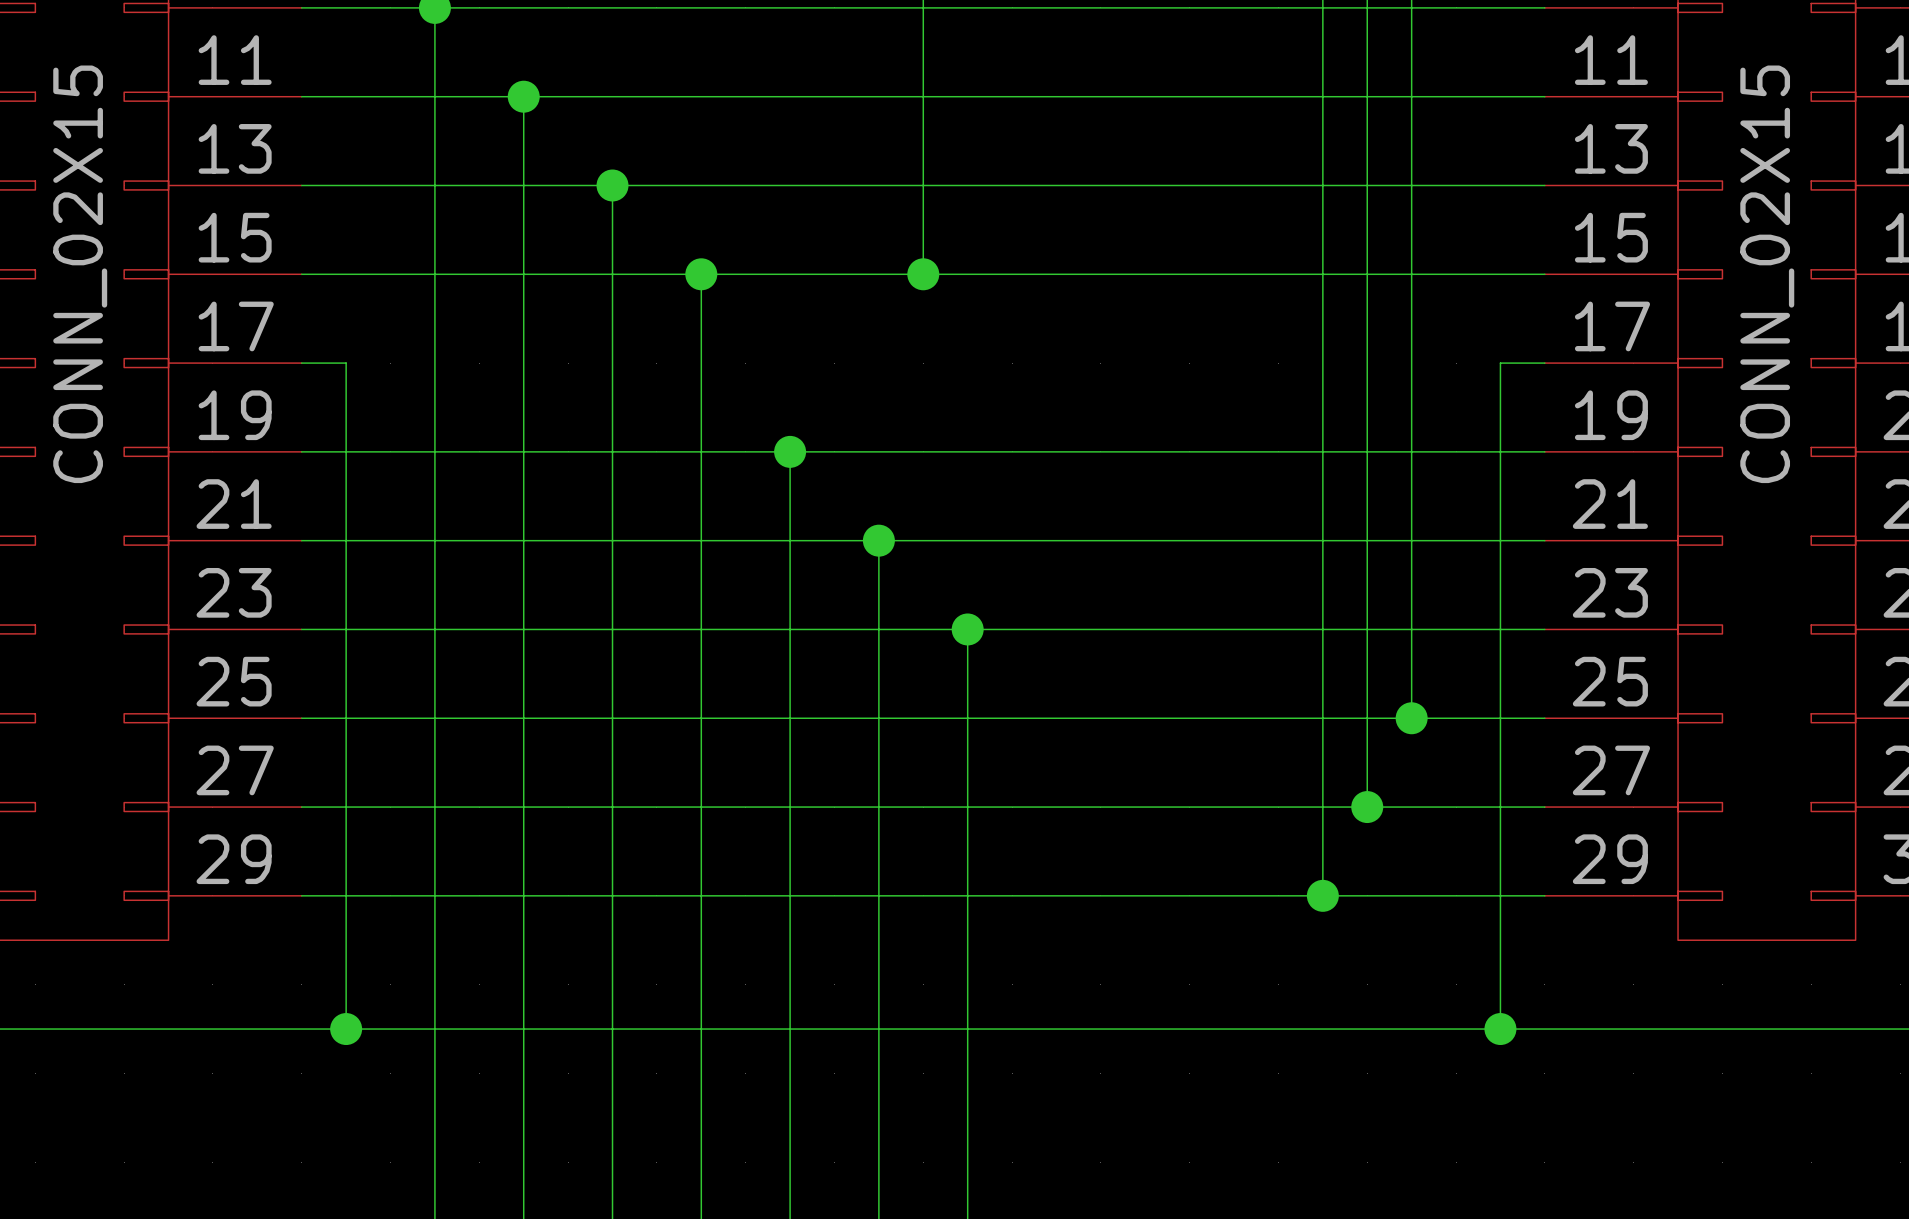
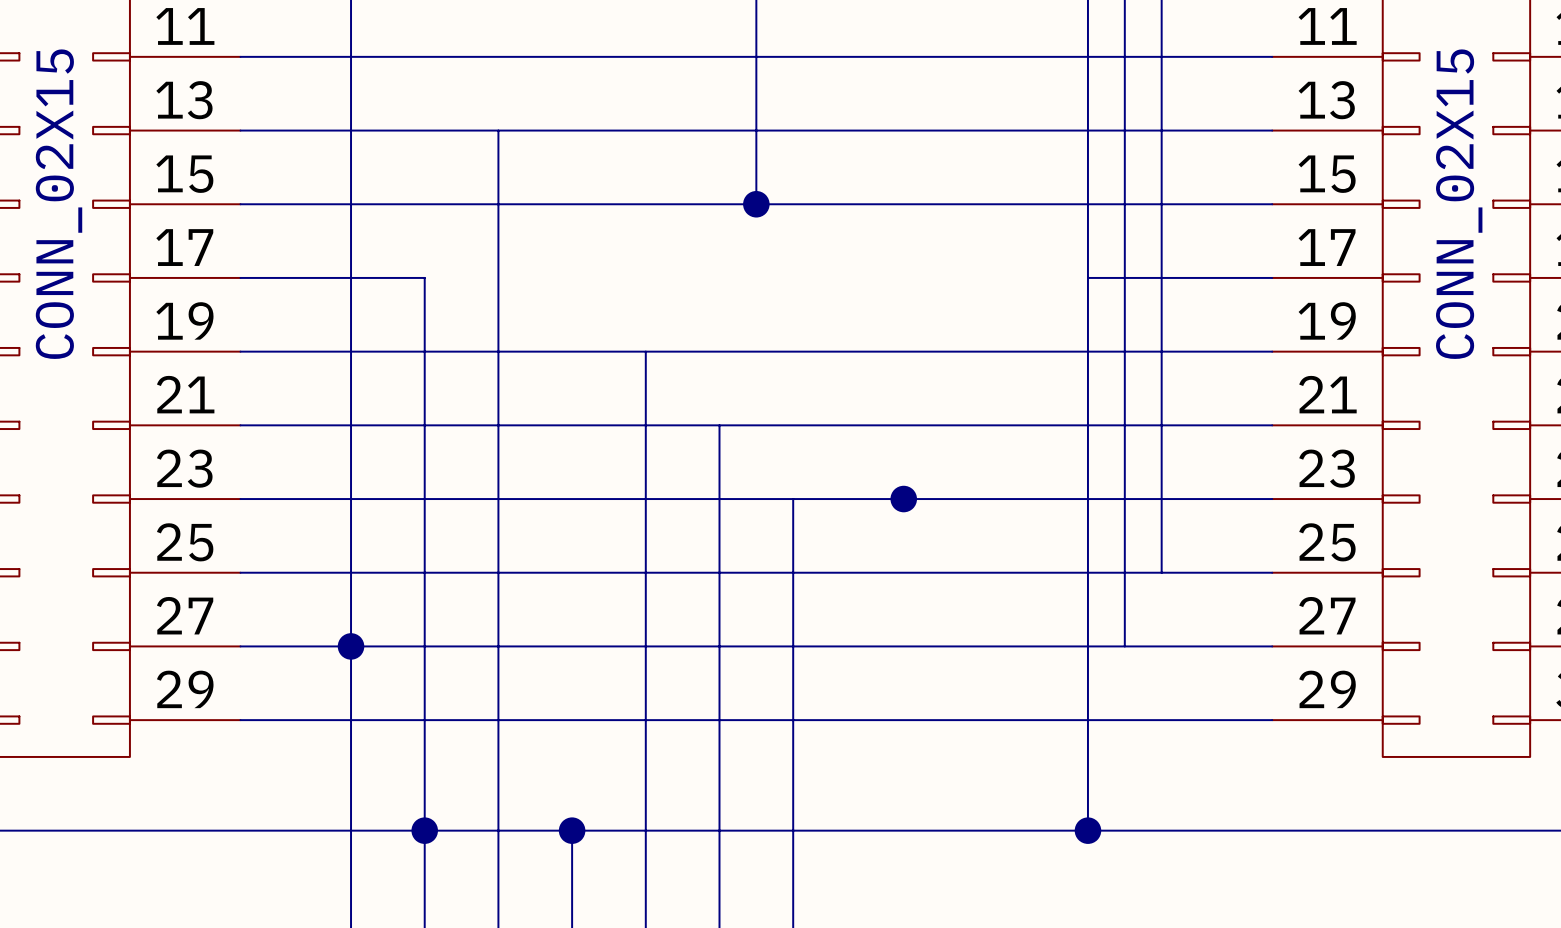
wire: (523, 96) (523, 363) -> (277, 277) (424, 277)
junction: (523, 96) -> none
junction: (612, 185) -> none
wire: (701, 274) (701, 1029) -> none
junction: (701, 274) -> none
wire: (346, 363) (346, 1029) -> none
wire: (1500, 363) (1500, 1029) -> (1235, 277) (1087, 277)
junction: (790, 451) -> none
junction: (878, 540) -> none
junction: (967, 629) -> none
junction: none -> (903, 499)
junction: (1411, 718) -> none
junction: none -> (351, 646)
junction: (1367, 807) -> none
wire: none -> (1087, 720) (1087, 830)
junction: (1322, 895) -> none
junction: (346, 1029) -> none
junction: none -> (424, 830)
junction: none -> (572, 830)
junction: none -> (1087, 830)
junction: (1500, 1029) -> none

